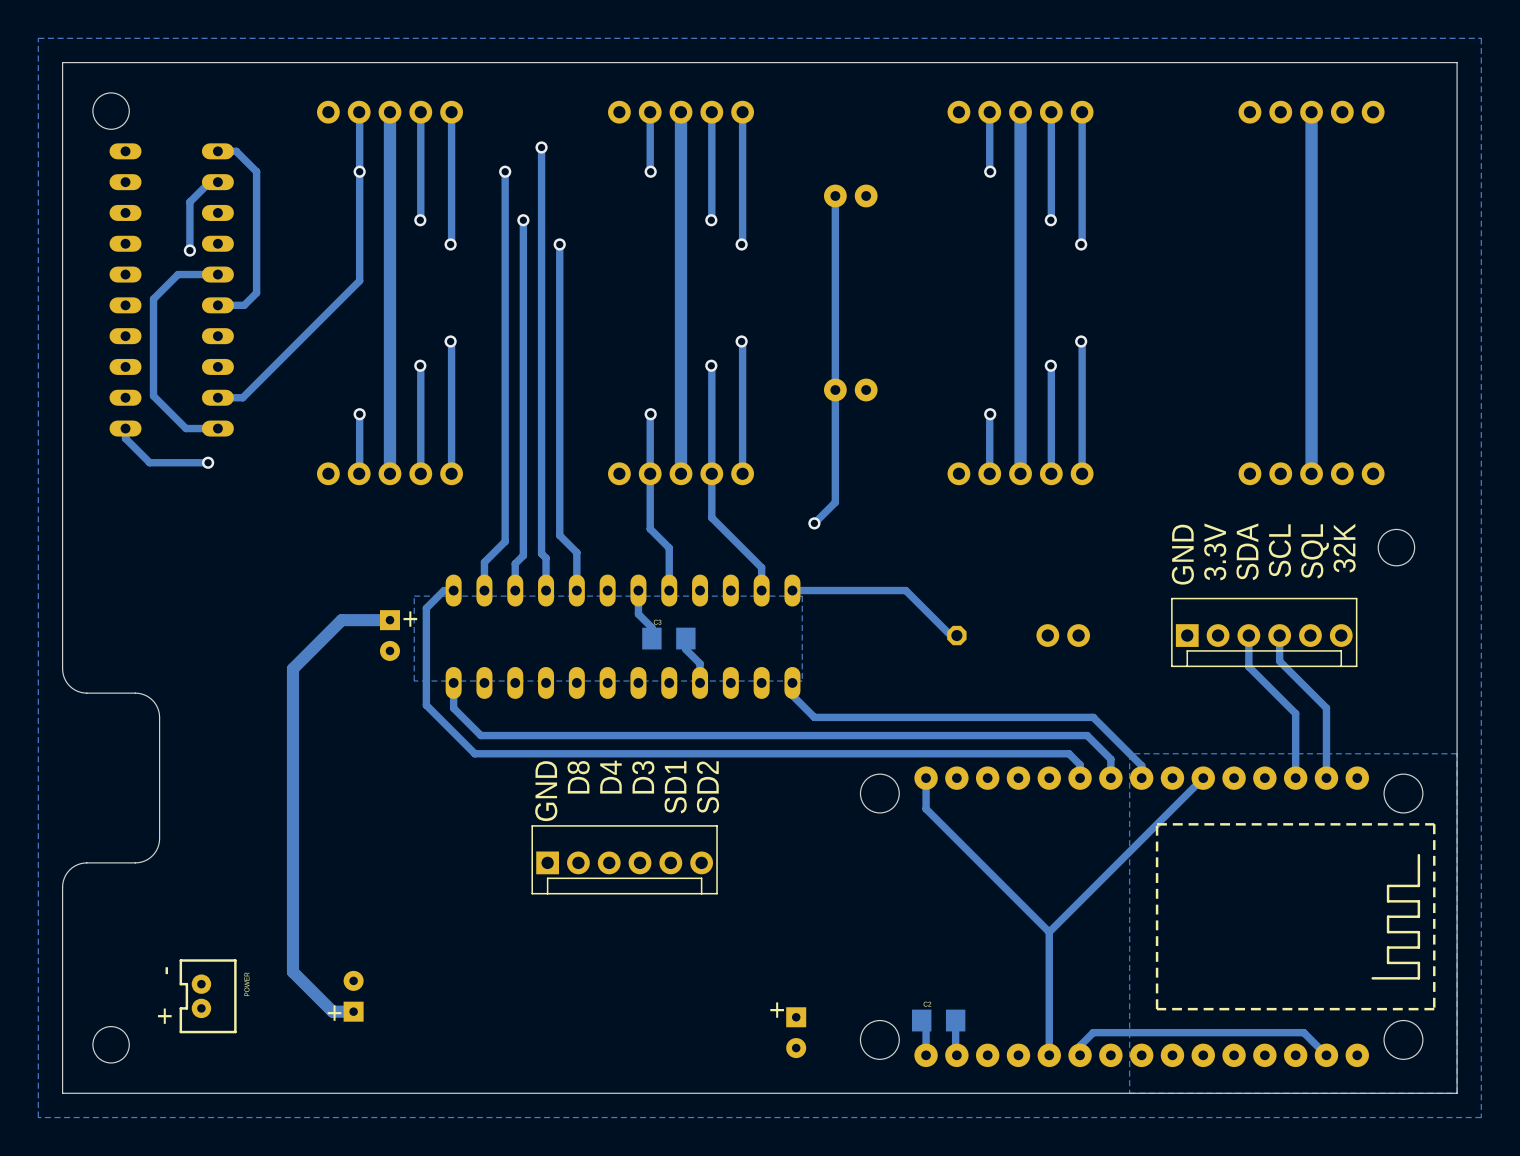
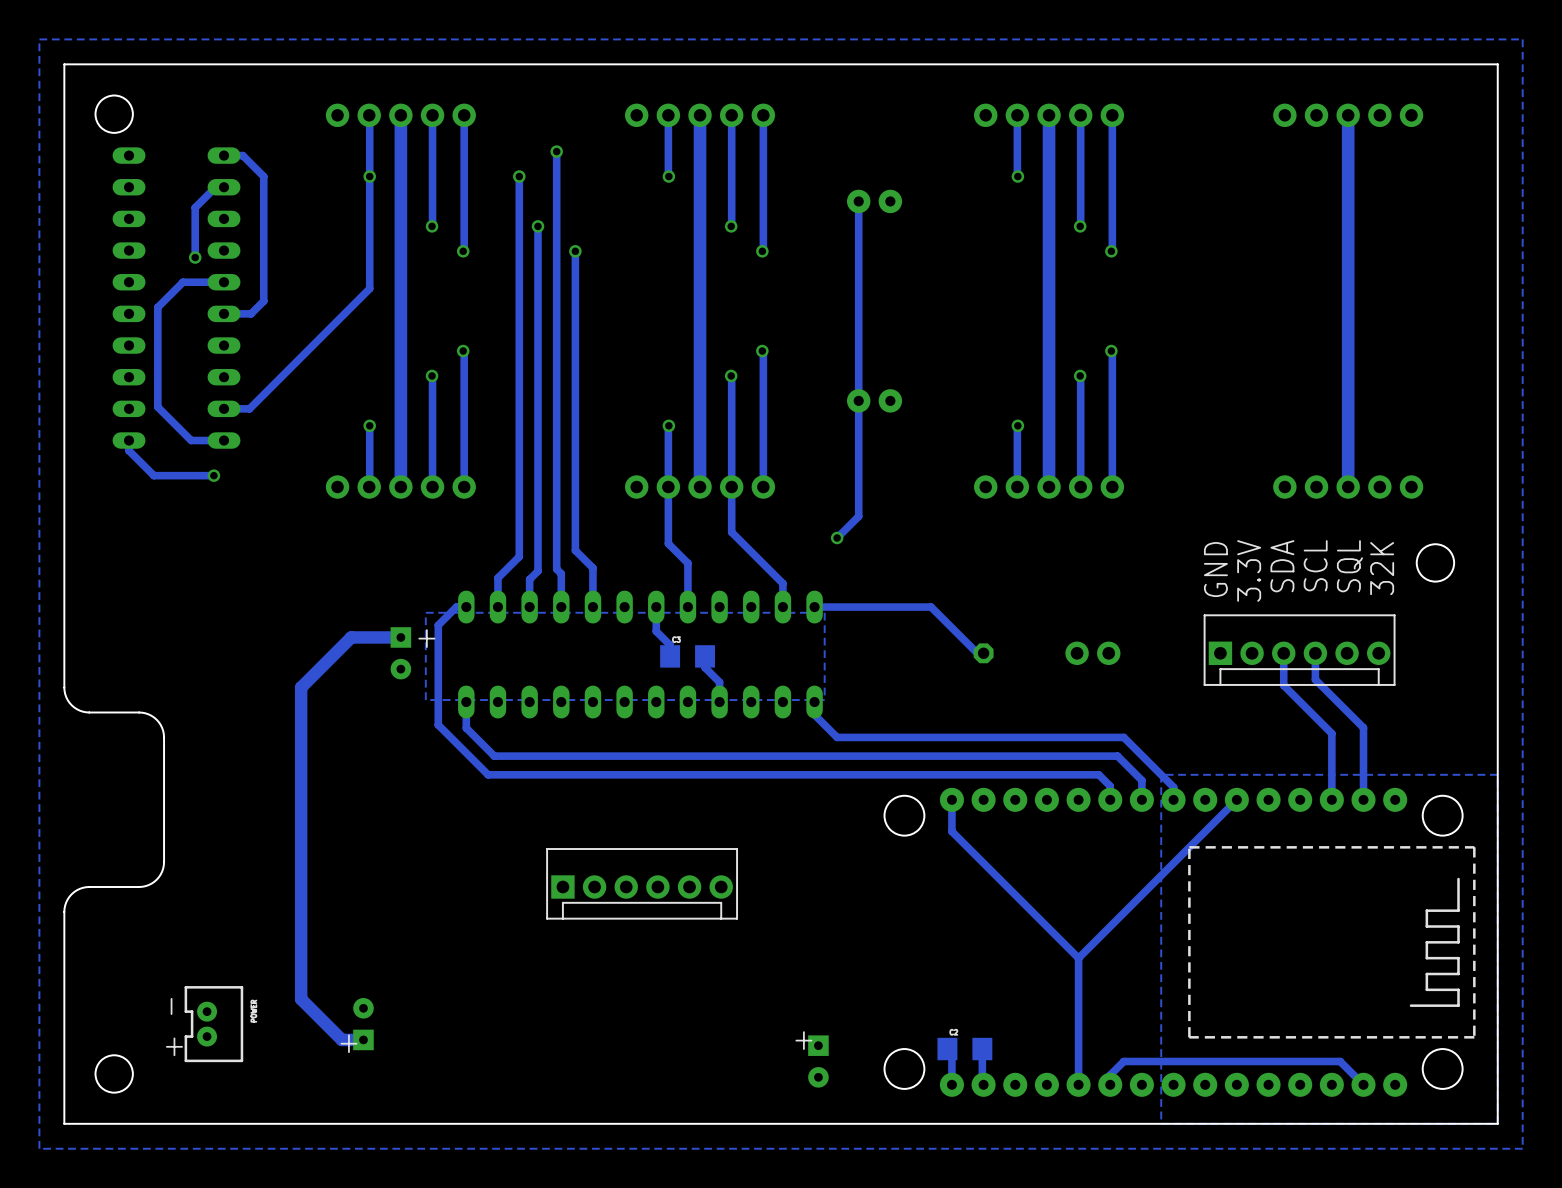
text: D8 (578, 777) -> none
text: D4 (610, 777) -> none
text: D3 (643, 777) -> none
text: SD1 (675, 787) -> none
text: SD2 (707, 787) -> none
text: GND (546, 791) -> none

